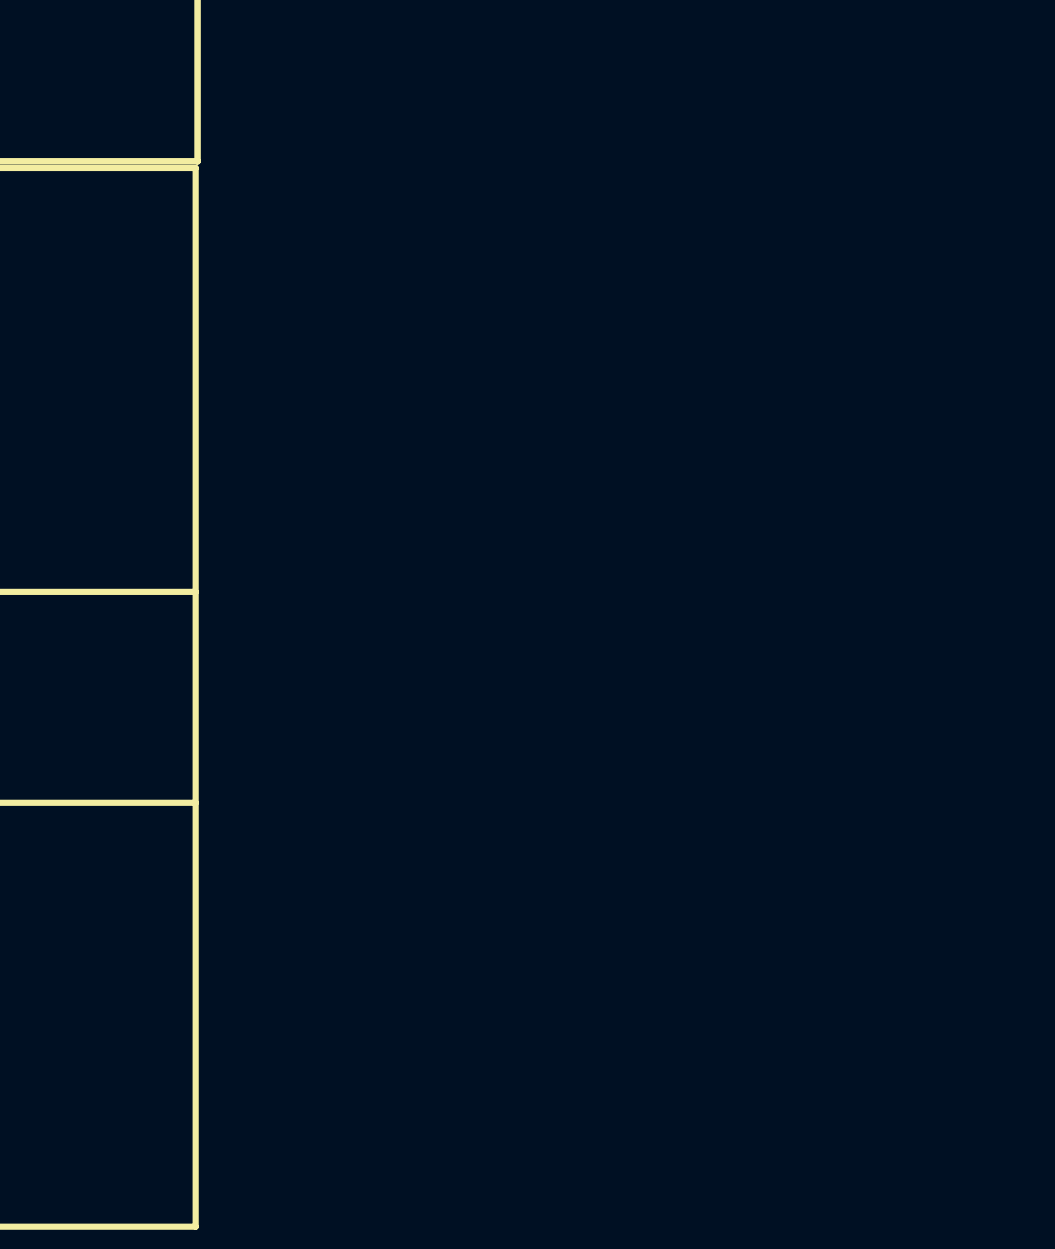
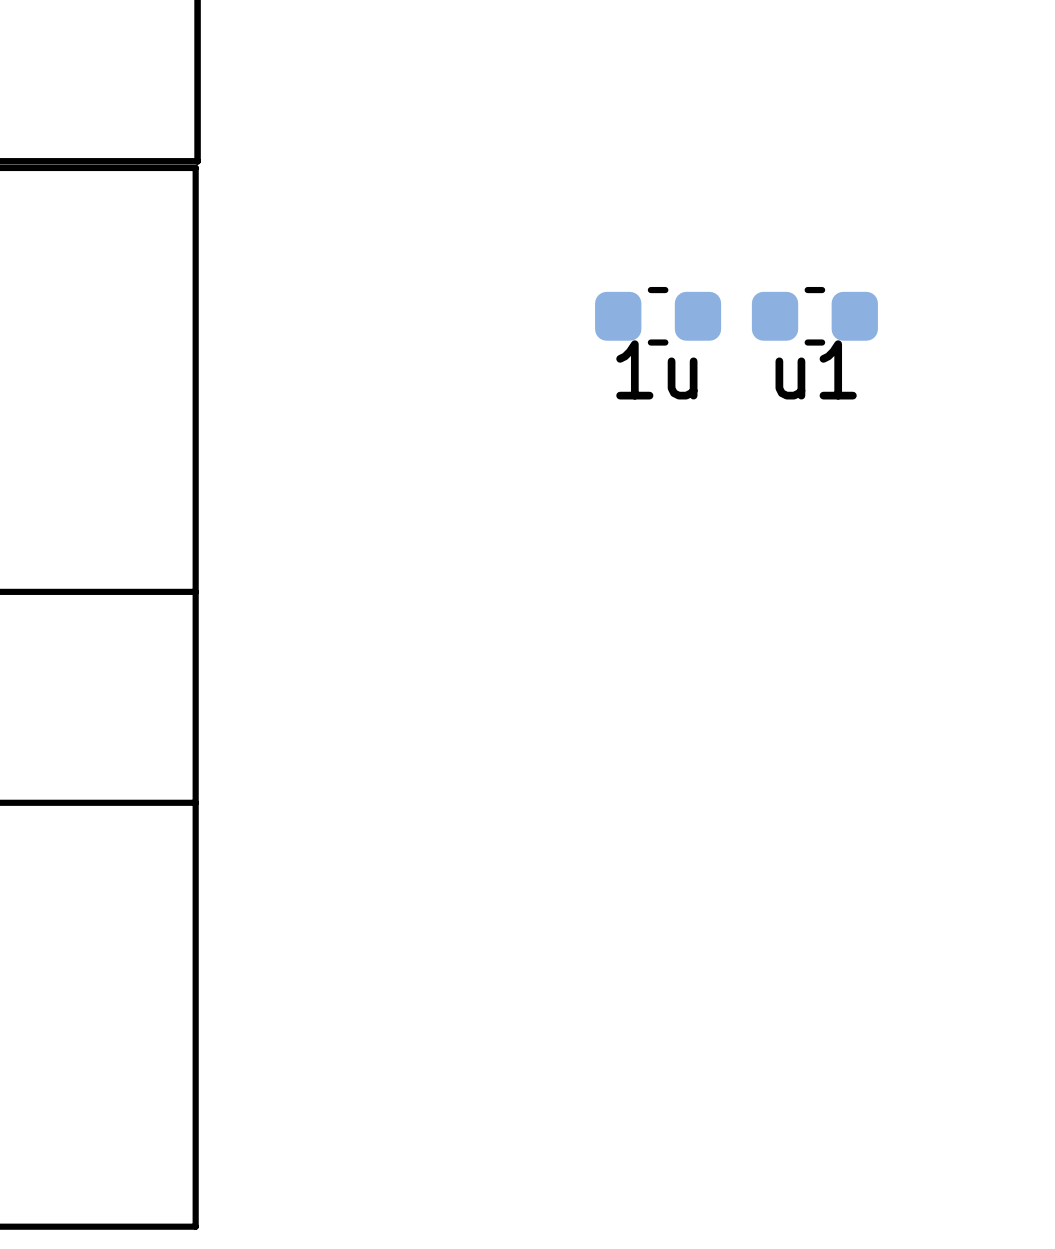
part: none -> 1u (658, 316)
part: none -> u1 (814, 316)

